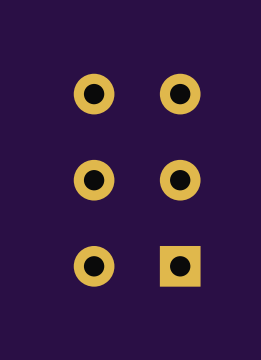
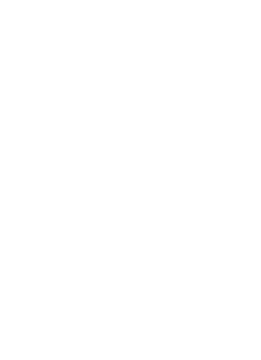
part: (137, 180) -> none

